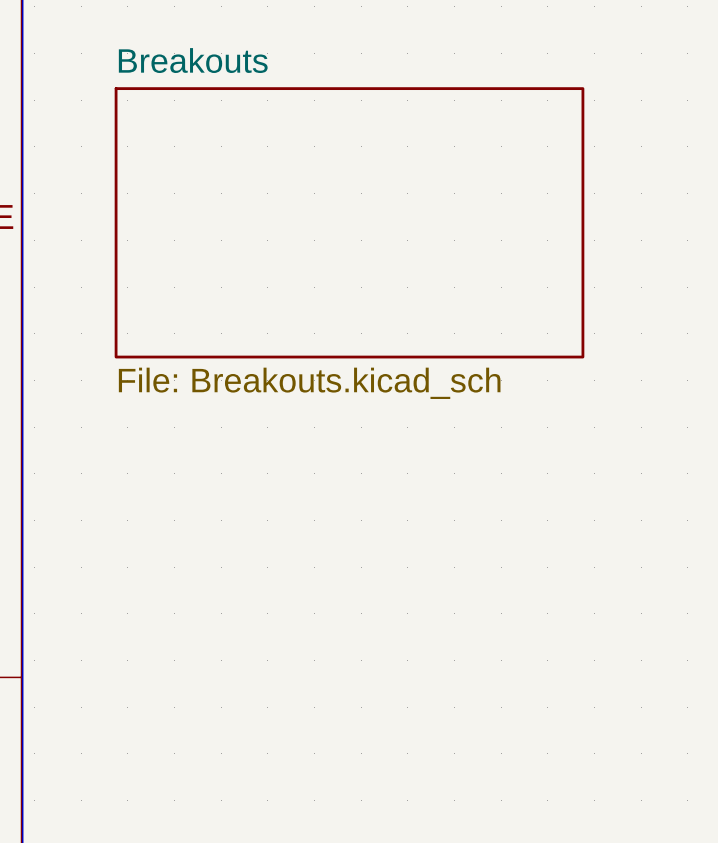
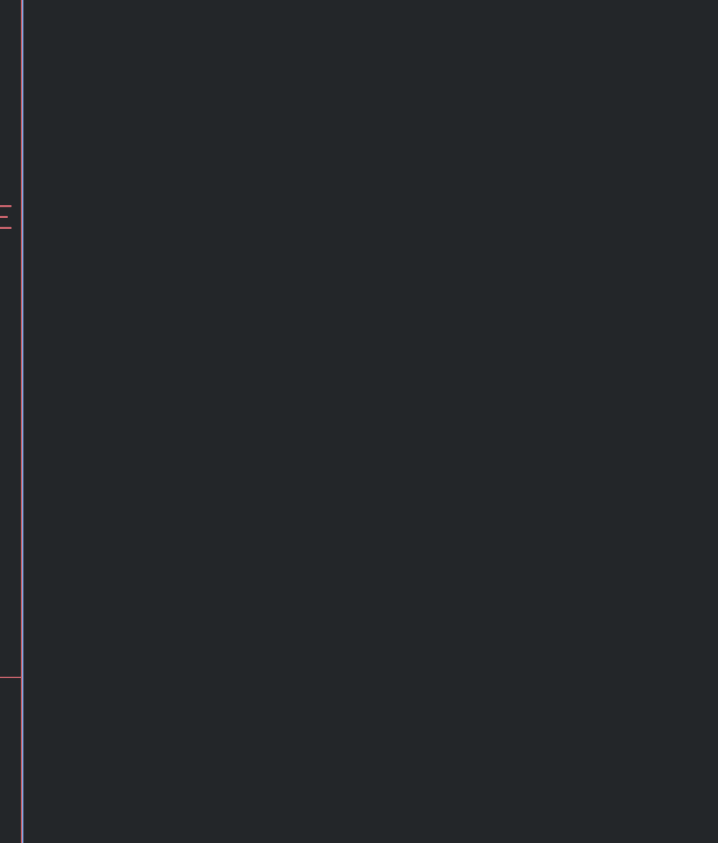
sheet Breakouts: File: Breakouts.kicad_sch (349, 222) -> none

